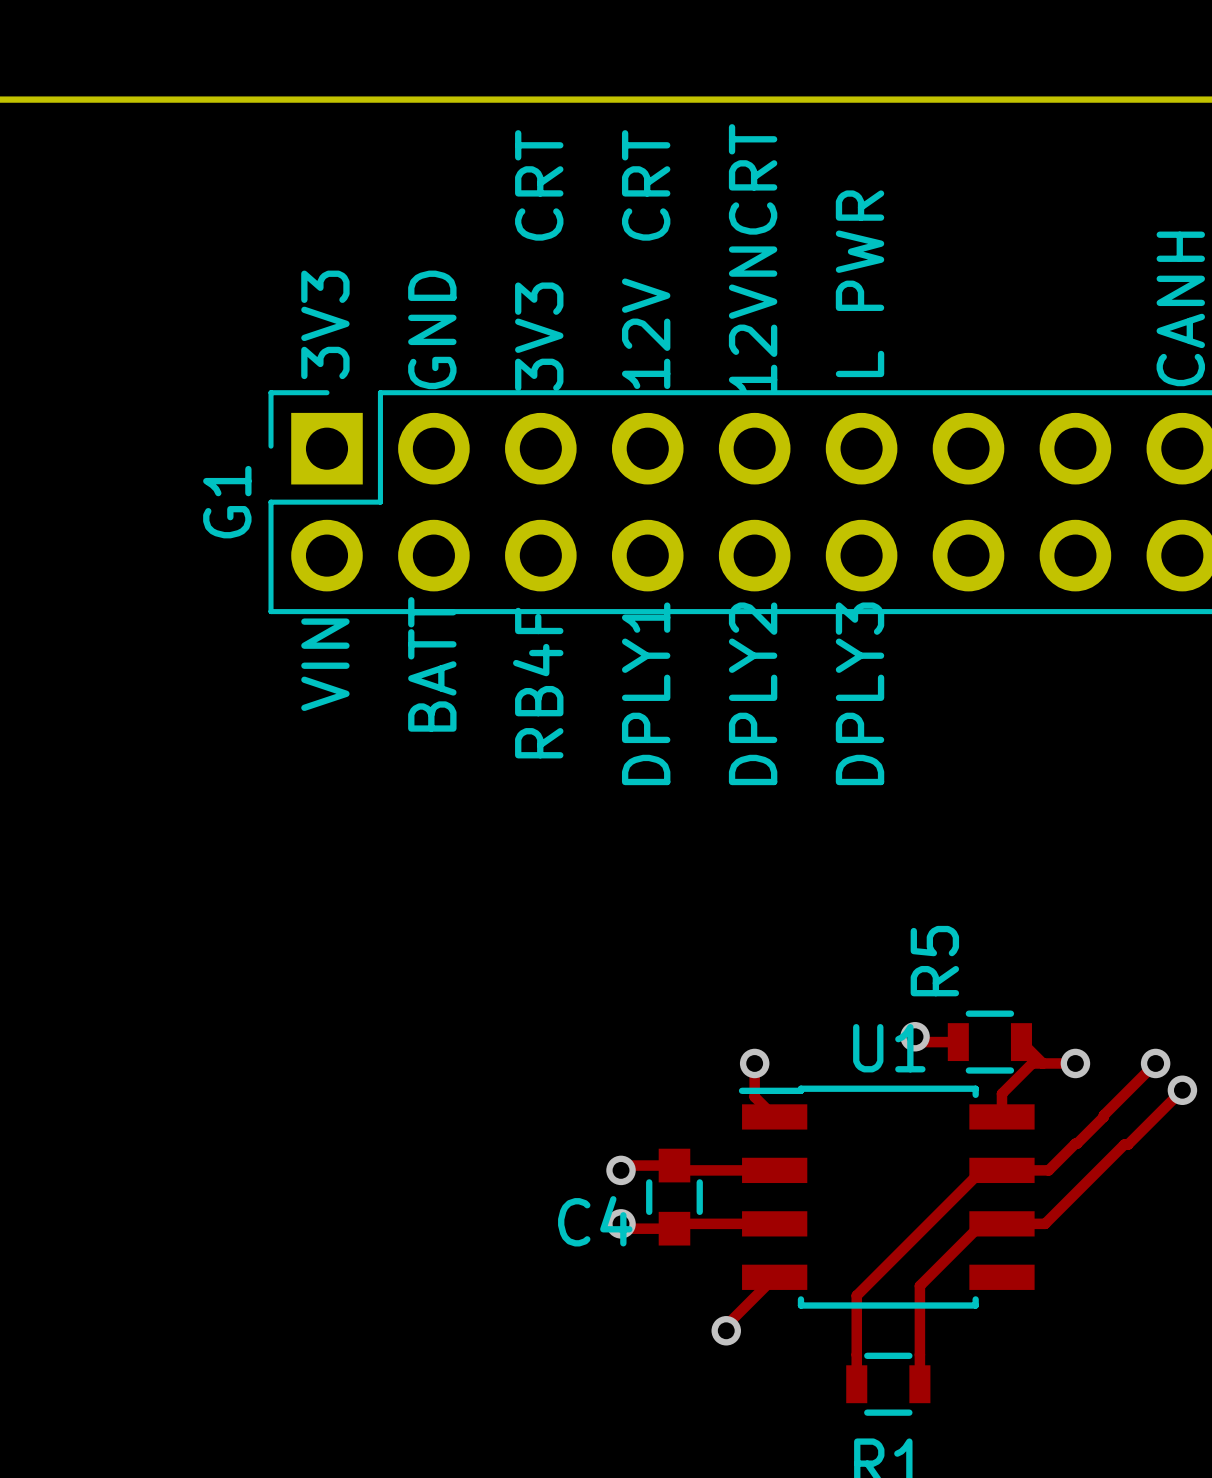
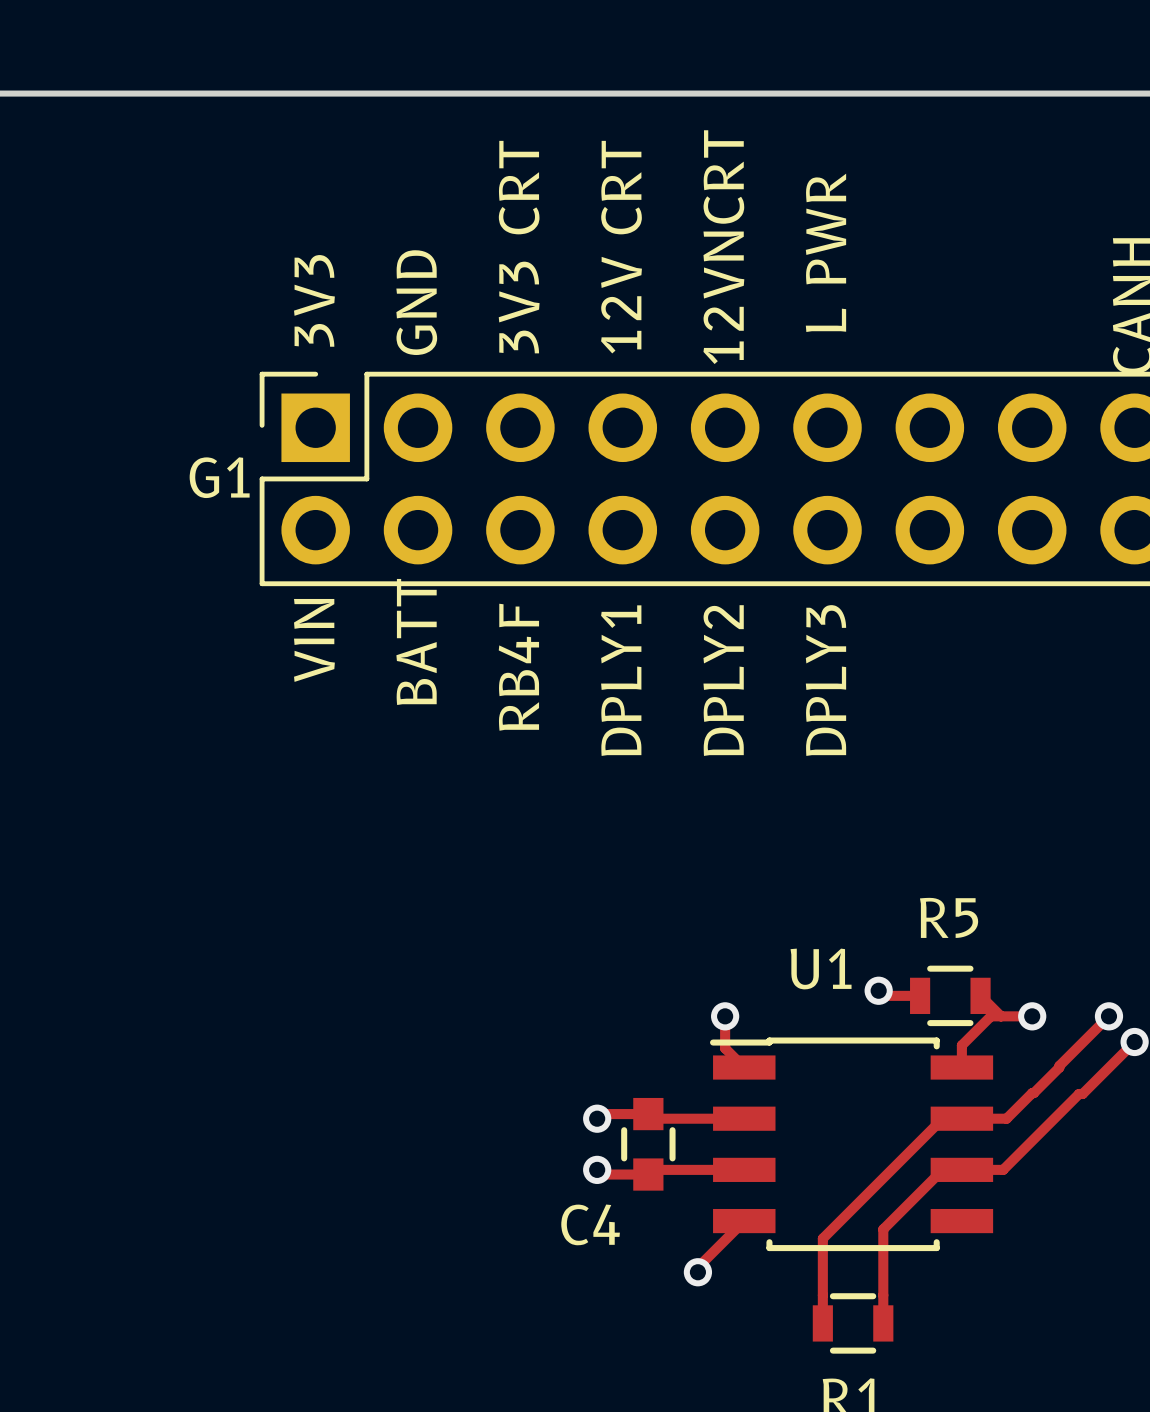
G1 name rotation: 0° (227, 502) -> 90° clockwise (219, 477)
R5 name rotation: 0° (934, 961) -> 90° clockwise (949, 917)
U1 name position: U1 (889, 1048) -> U1 (821, 969)
C4 name position: C4 (595, 1221) -> C4 (590, 1224)

